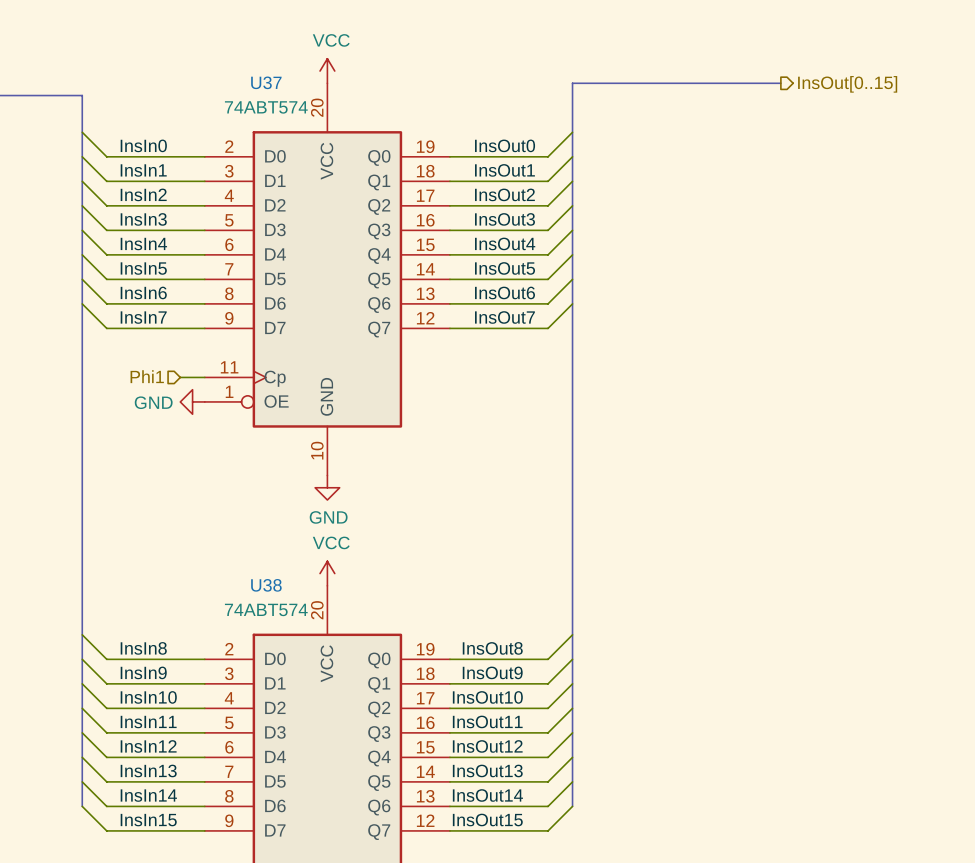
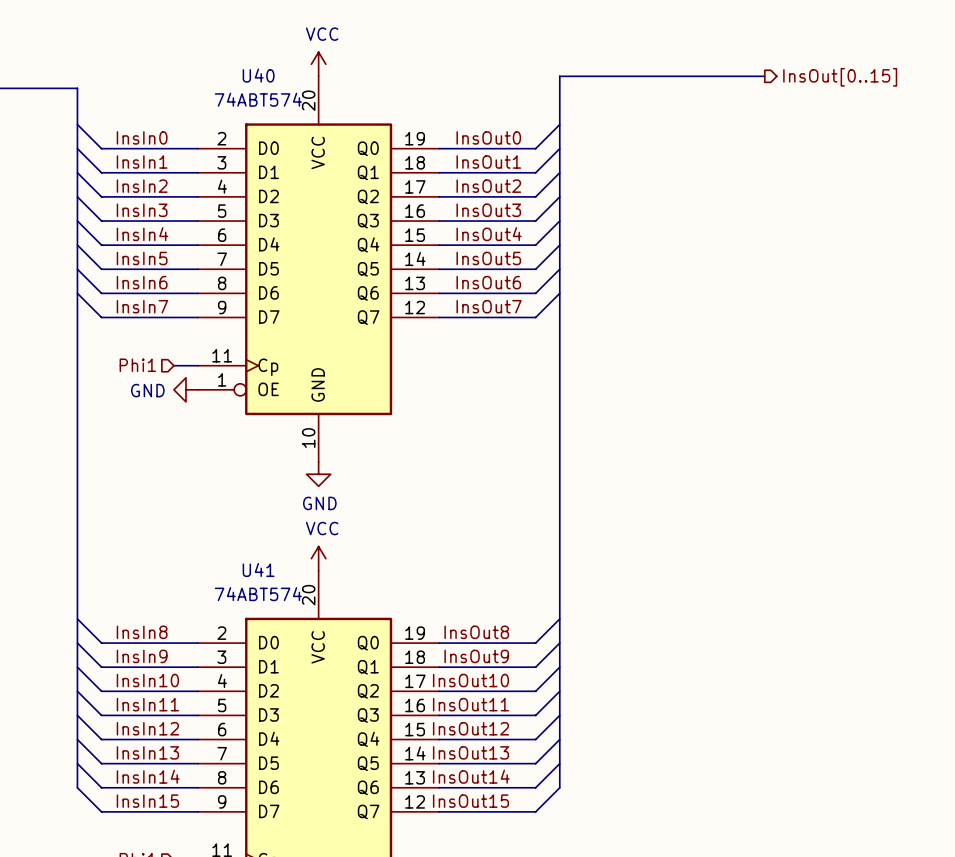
U37 name: U37 (266, 82) -> U40 (258, 75)
U38 name: U38 (266, 585) -> U41 (258, 569)

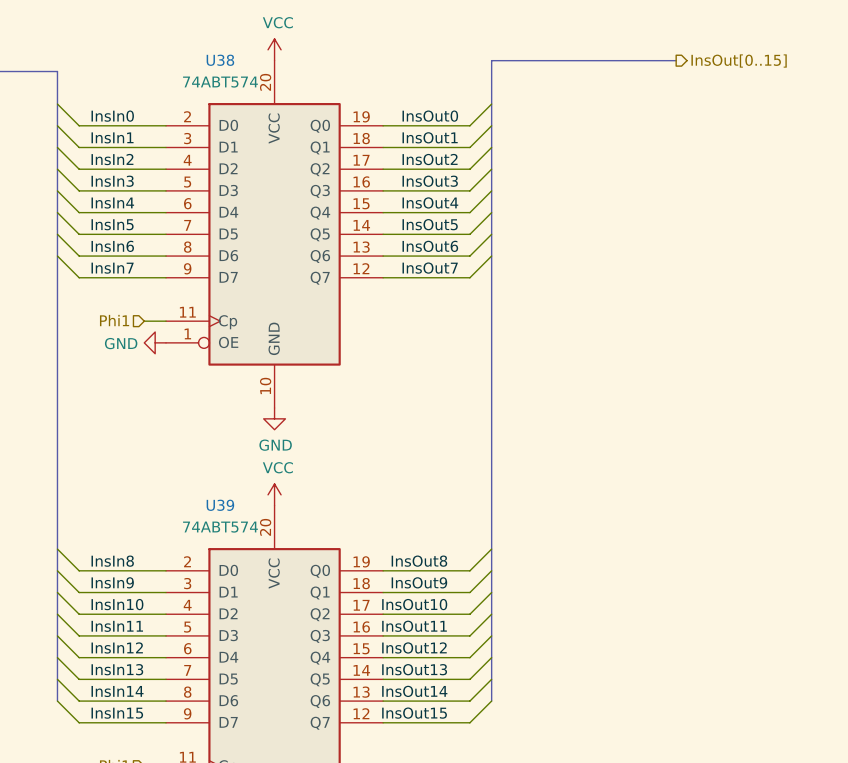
U40 name: U40 (258, 75) -> U38 (220, 60)
U41 name: U41 (258, 569) -> U39 (220, 505)

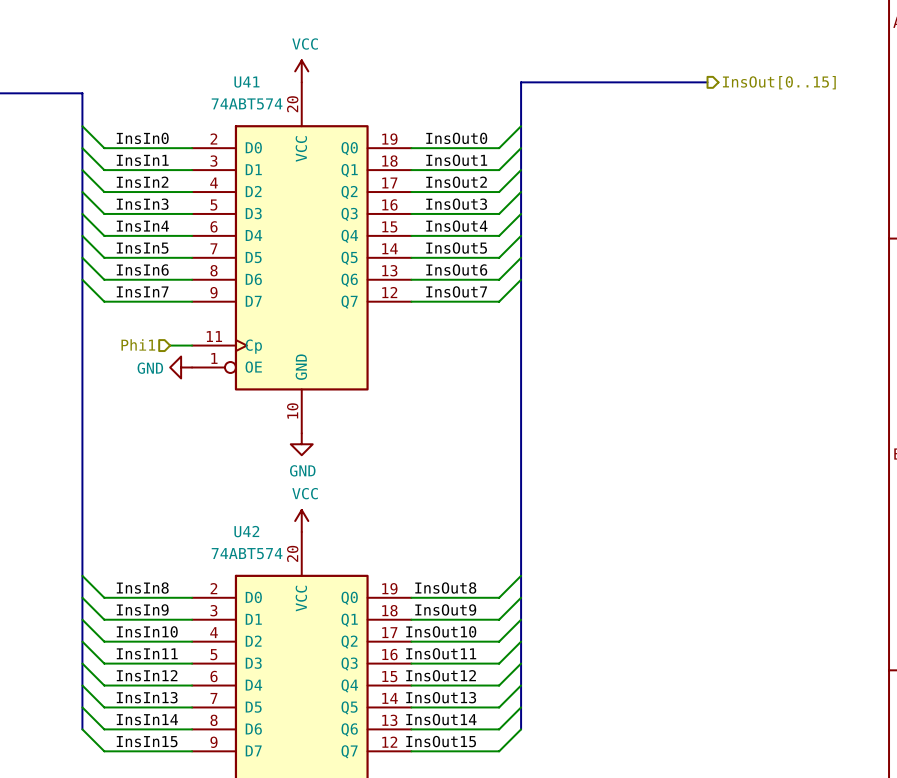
U38 name: U38 (220, 60) -> U41 (246, 82)
U39 name: U39 (220, 505) -> U42 (246, 531)

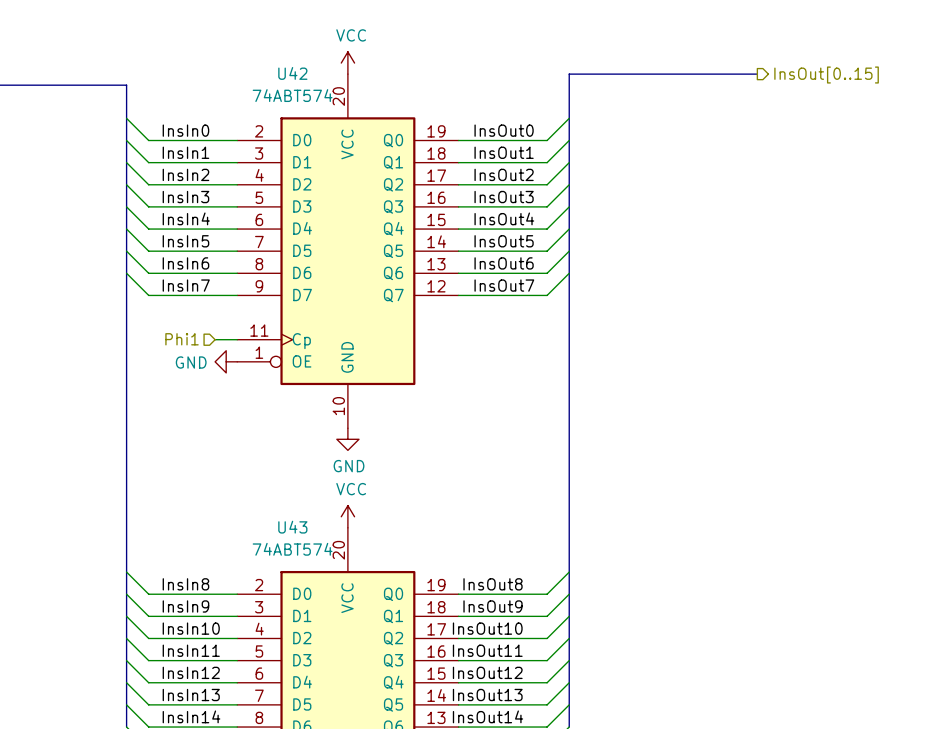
U41 name: U41 (246, 82) -> U42 (292, 73)
U42 name: U42 (246, 531) -> U43 (292, 527)

